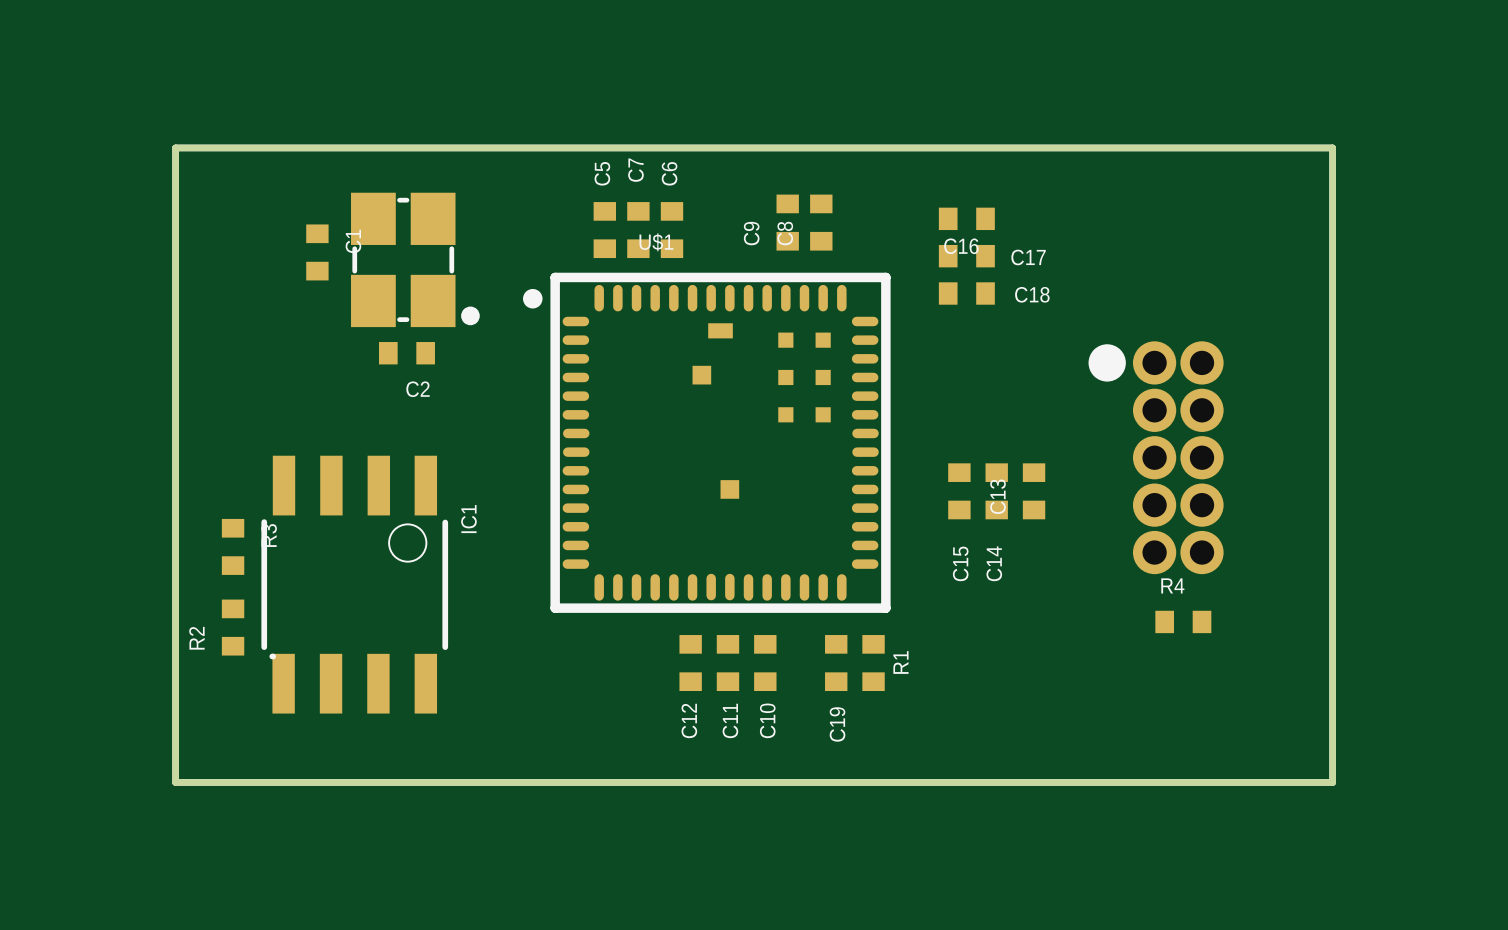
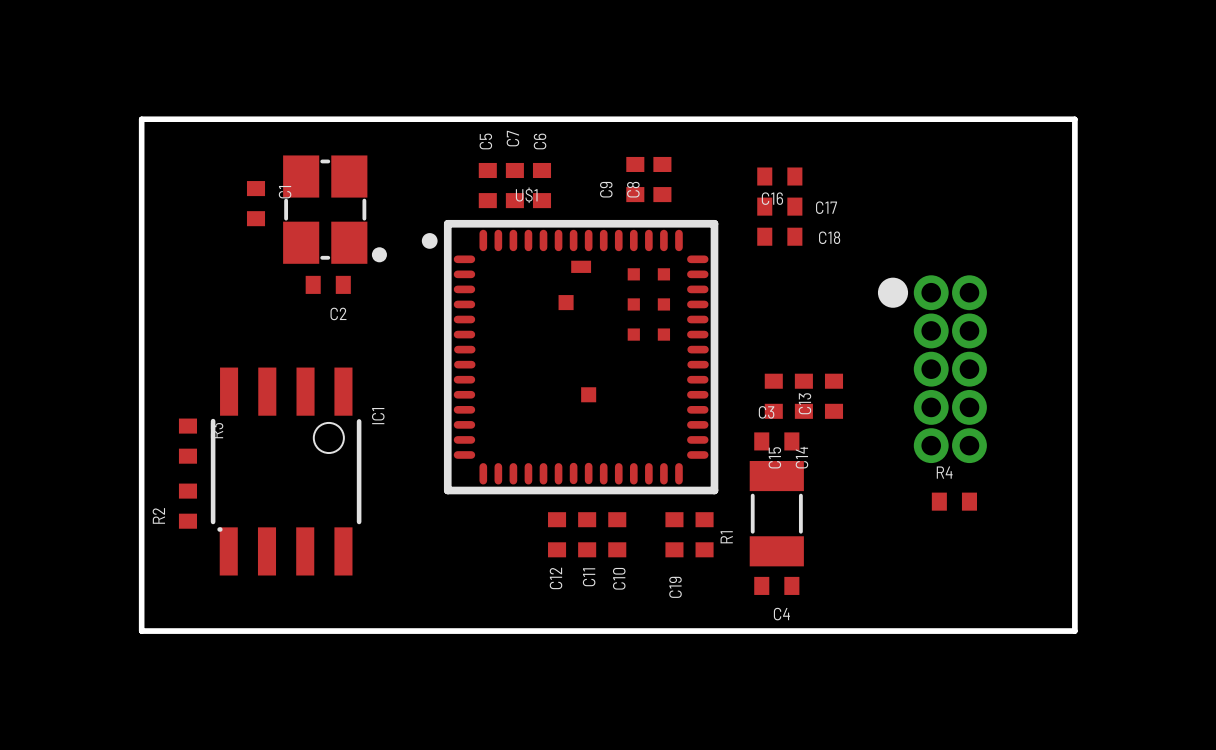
C3: none -> (776, 441)
part: none -> (776, 513)
C4: none -> (776, 585)

